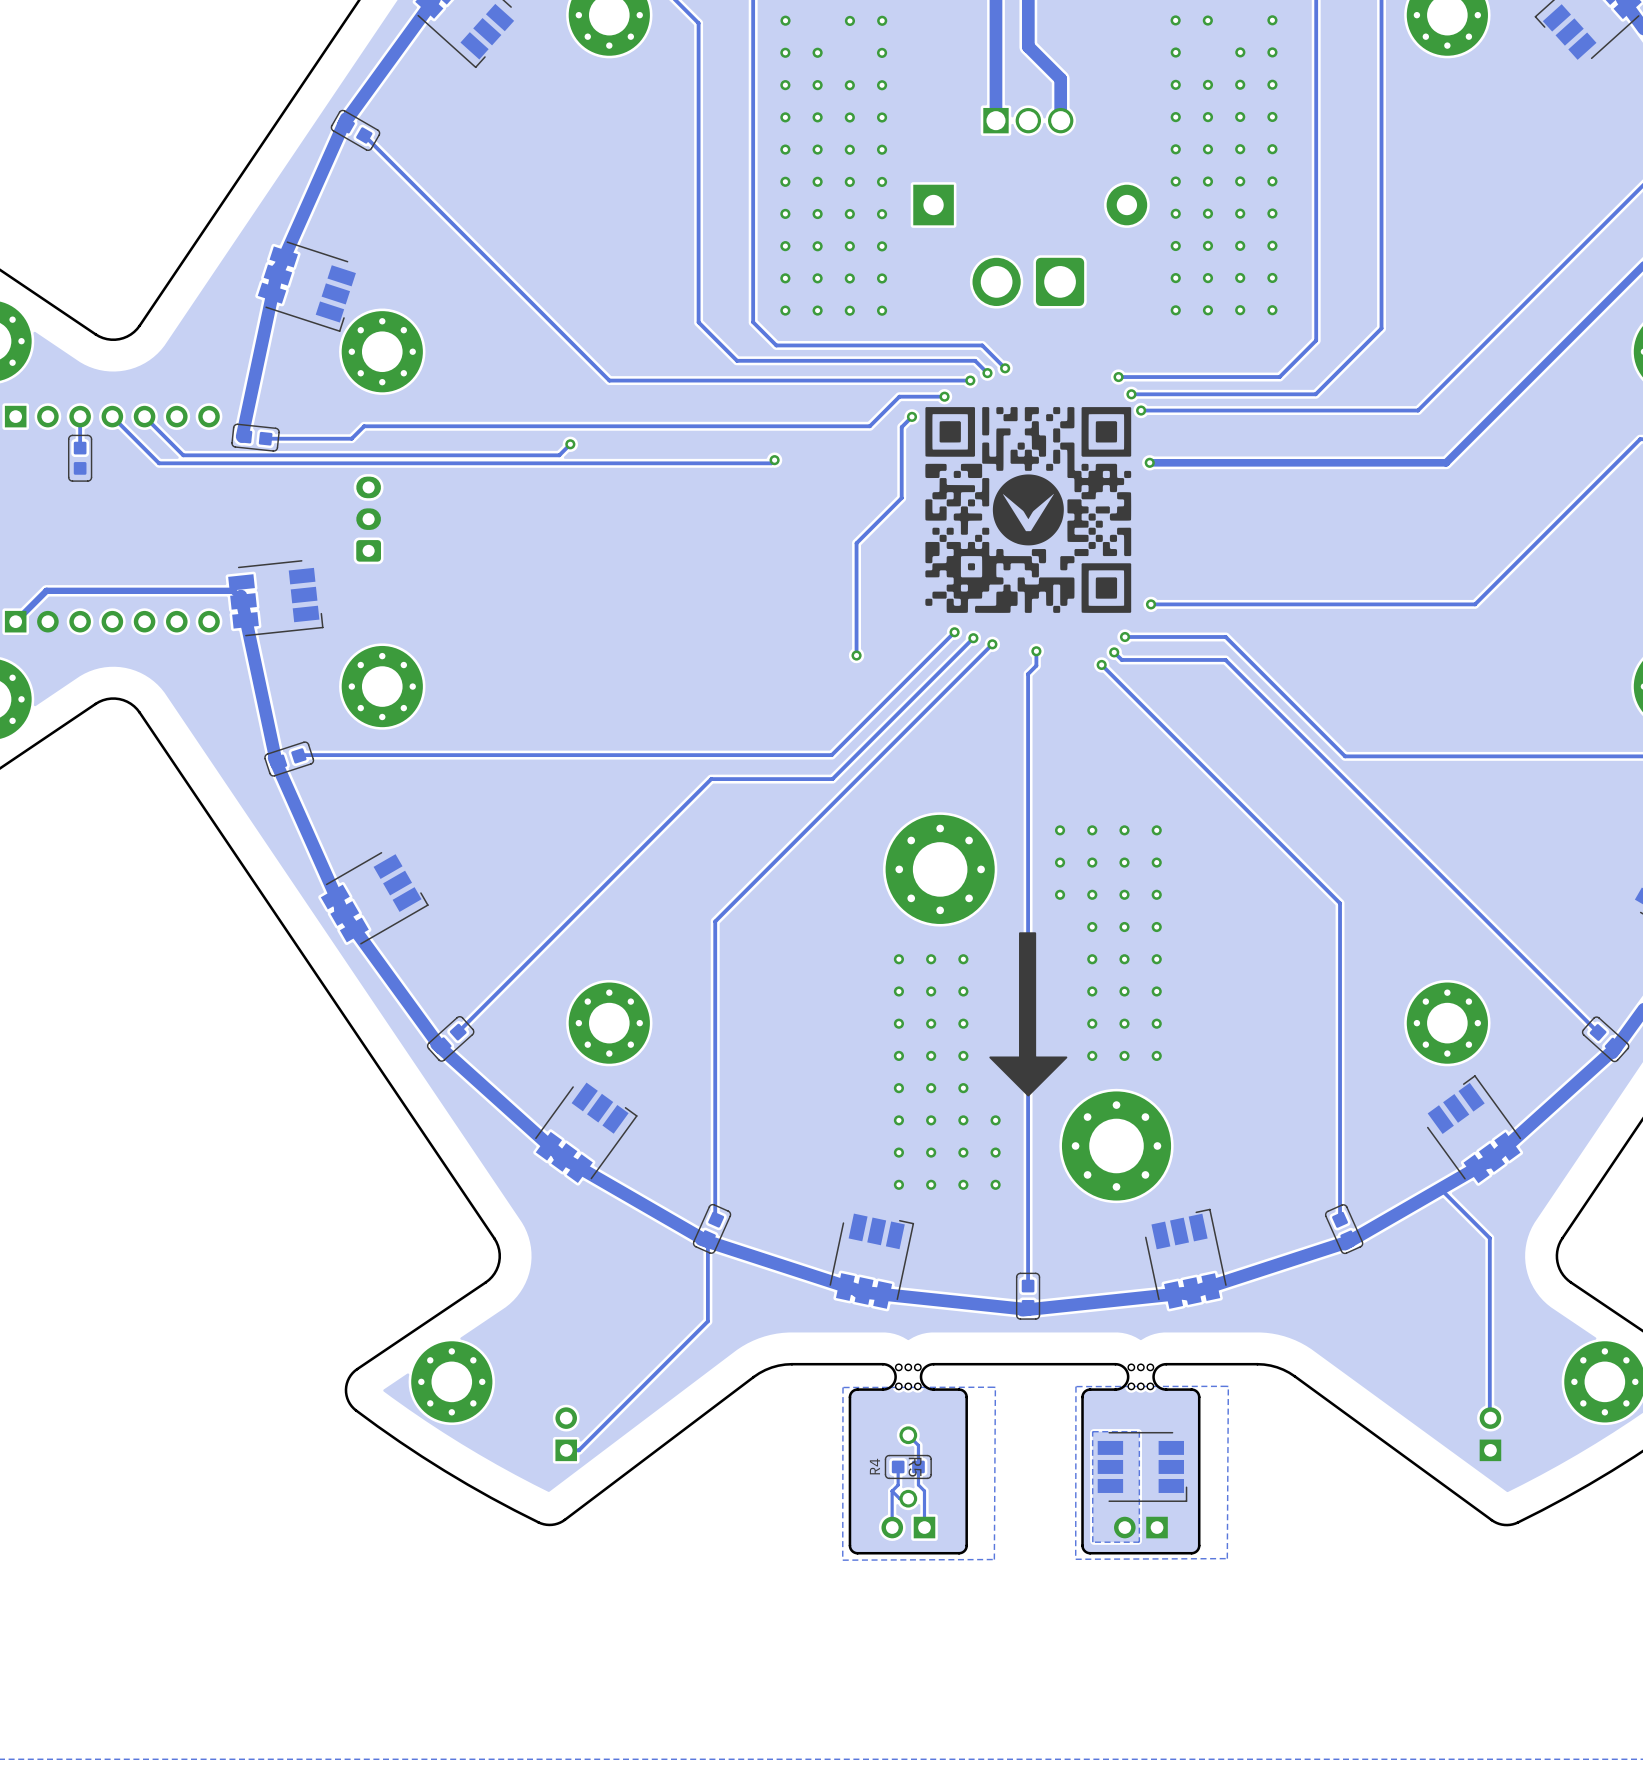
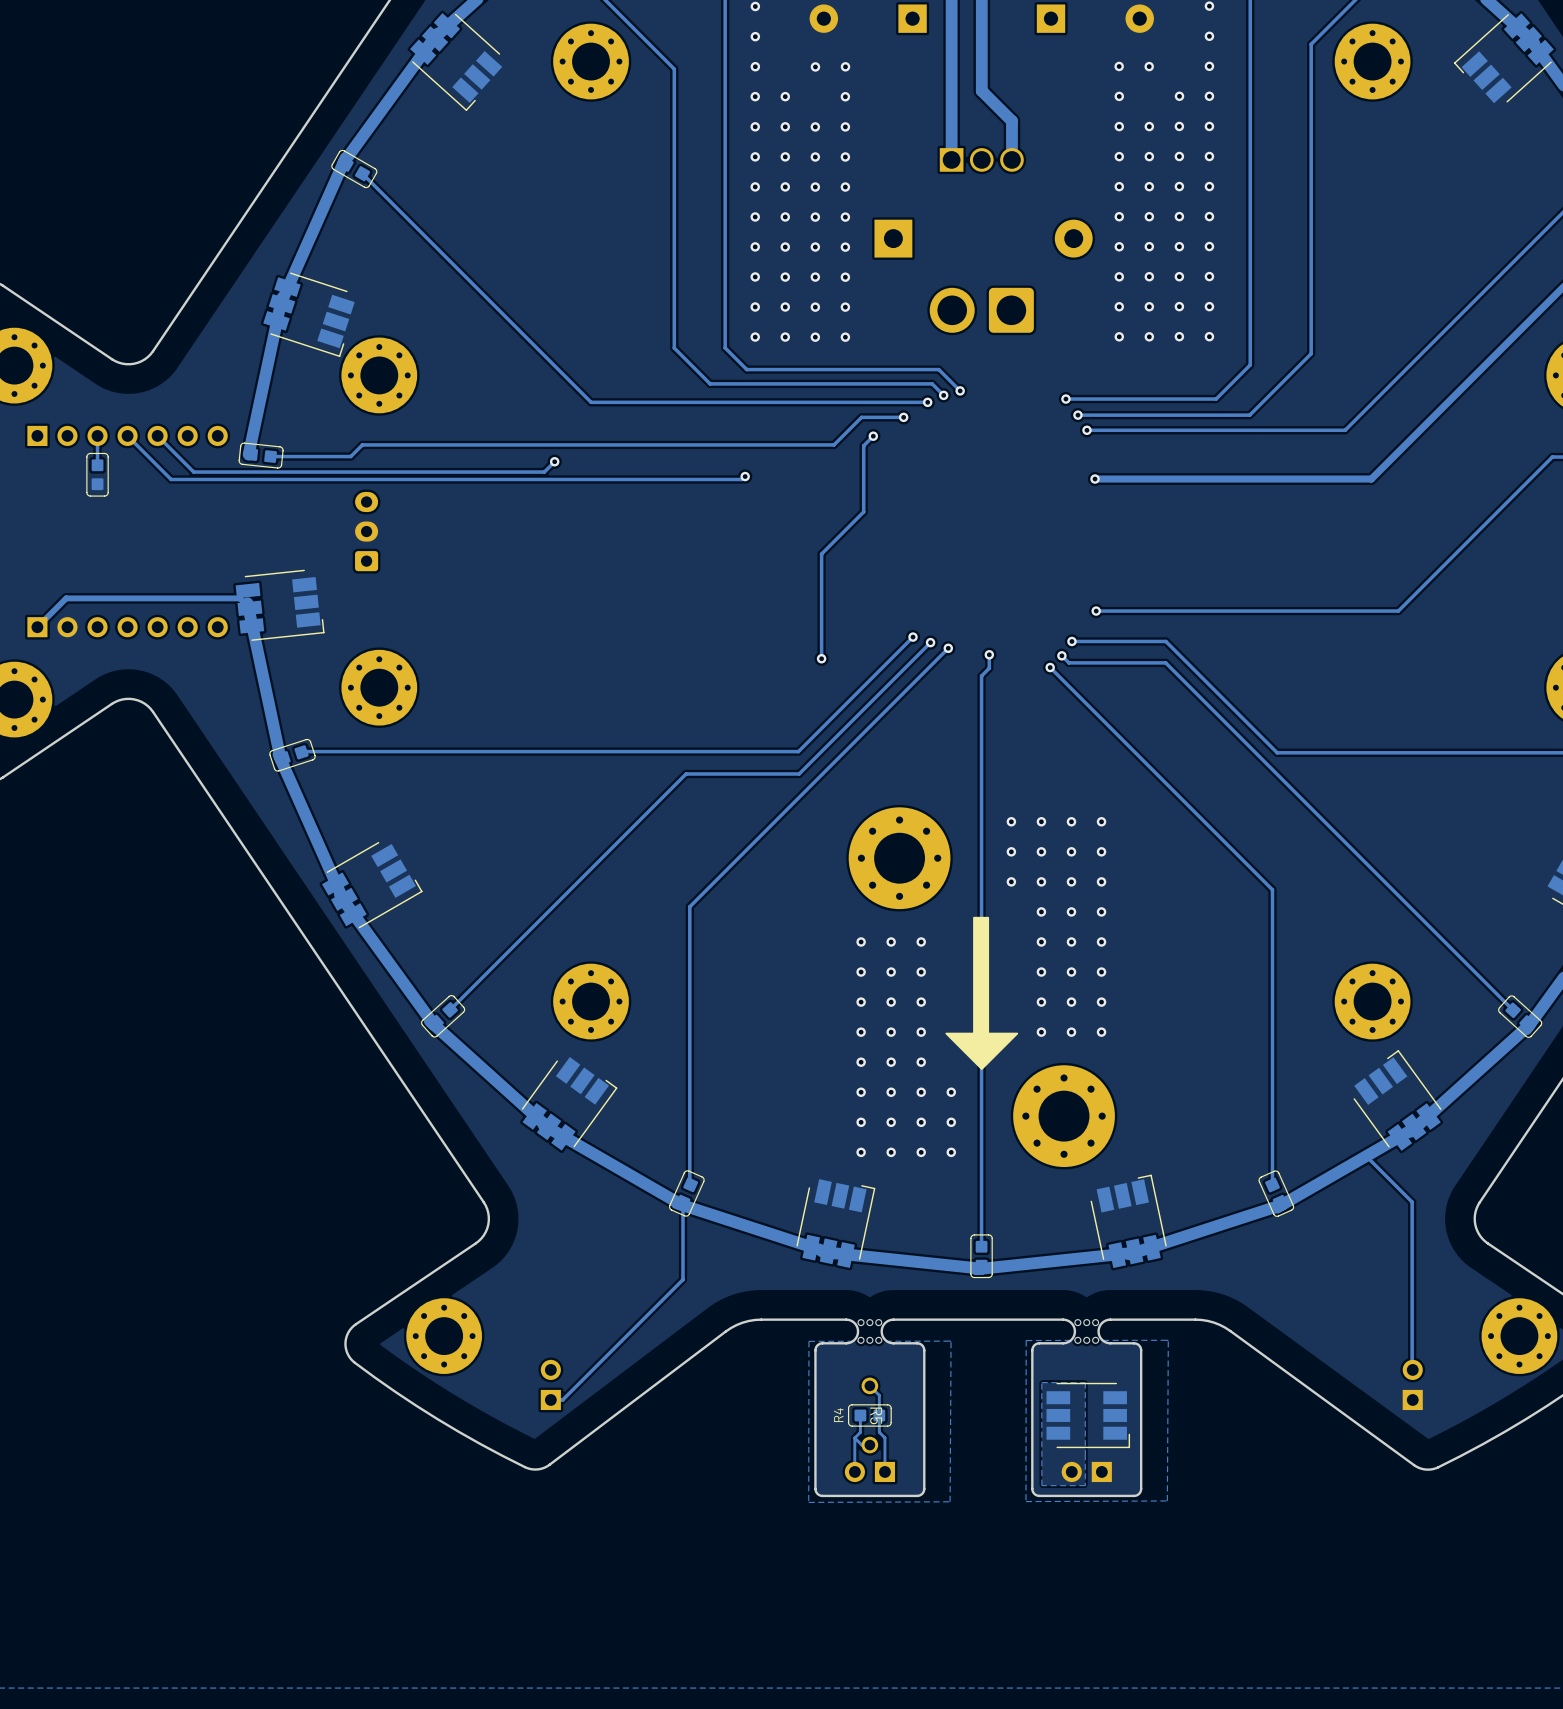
drawing: [925, 407, 1132, 613] -> none

